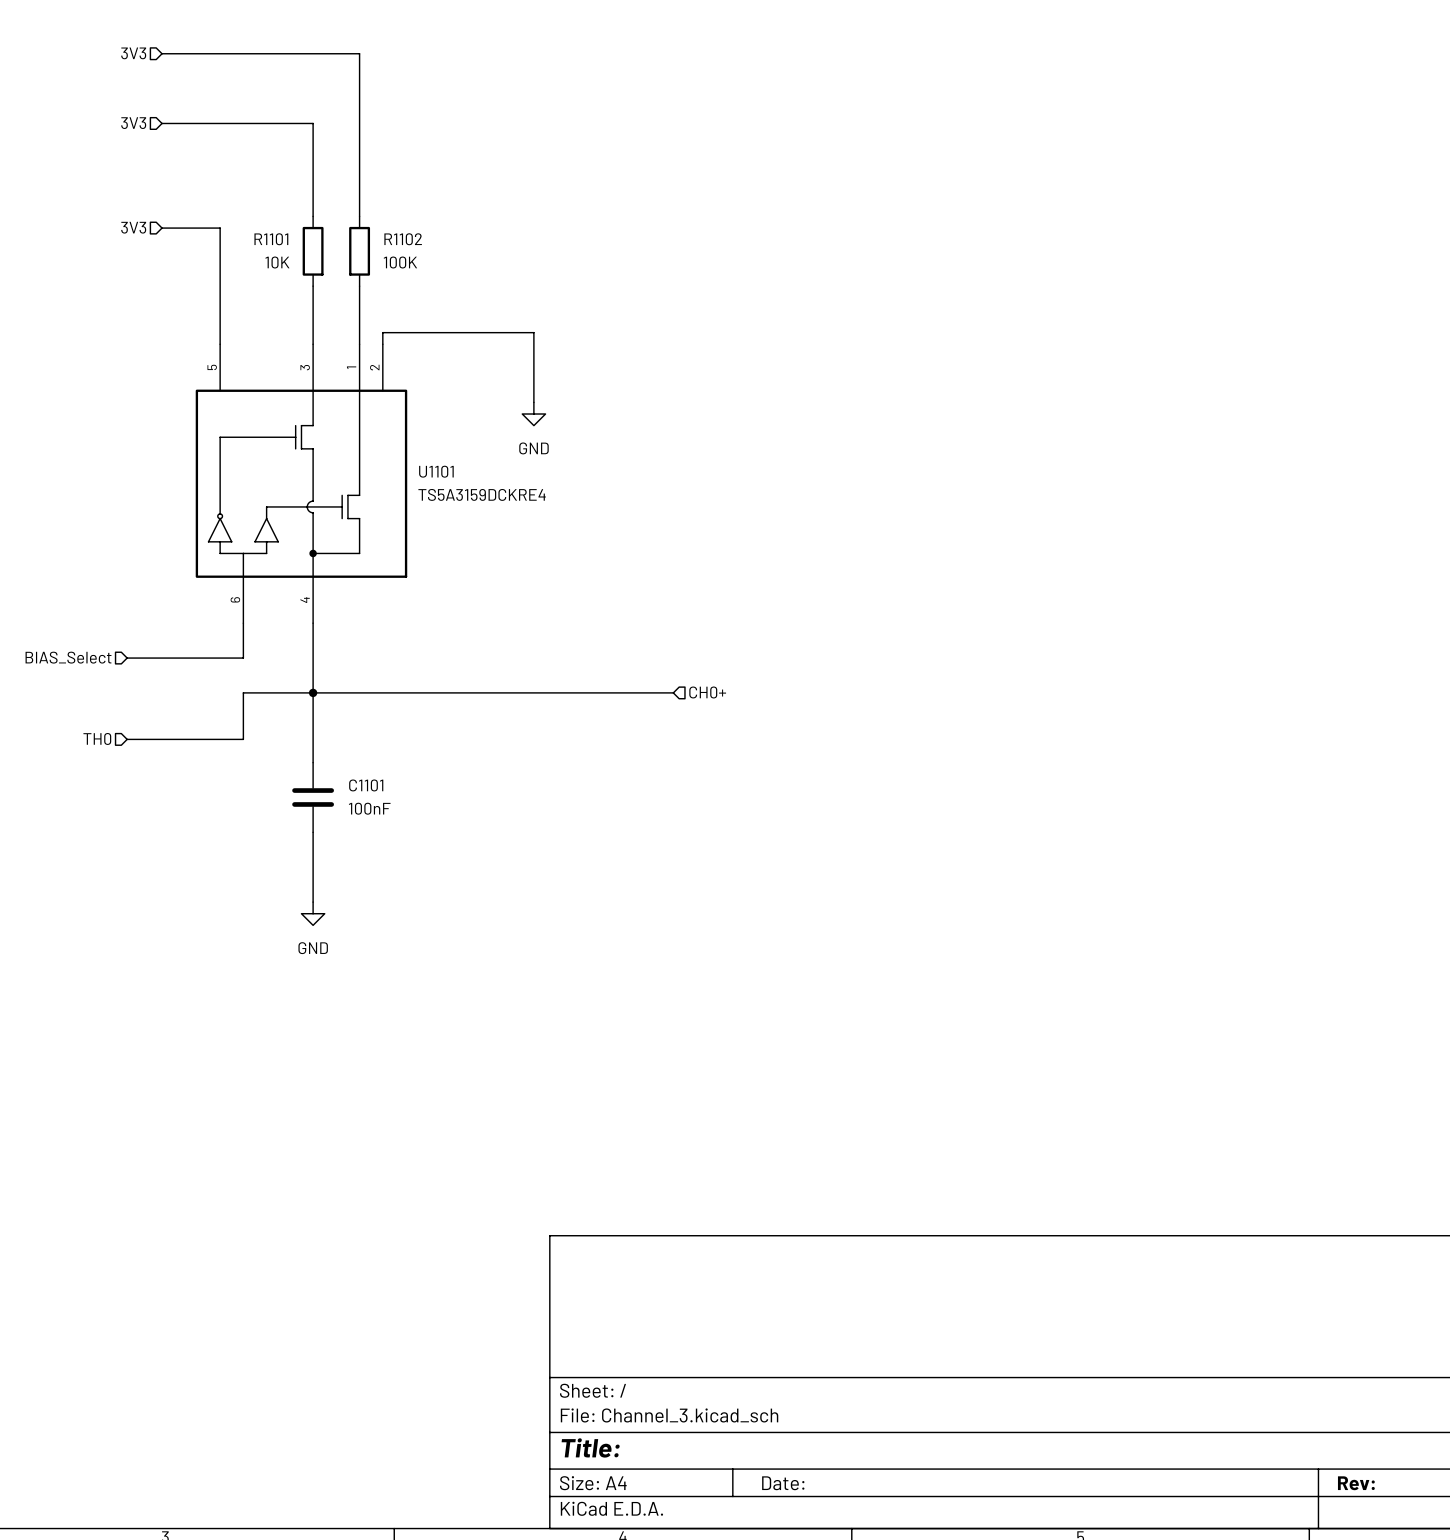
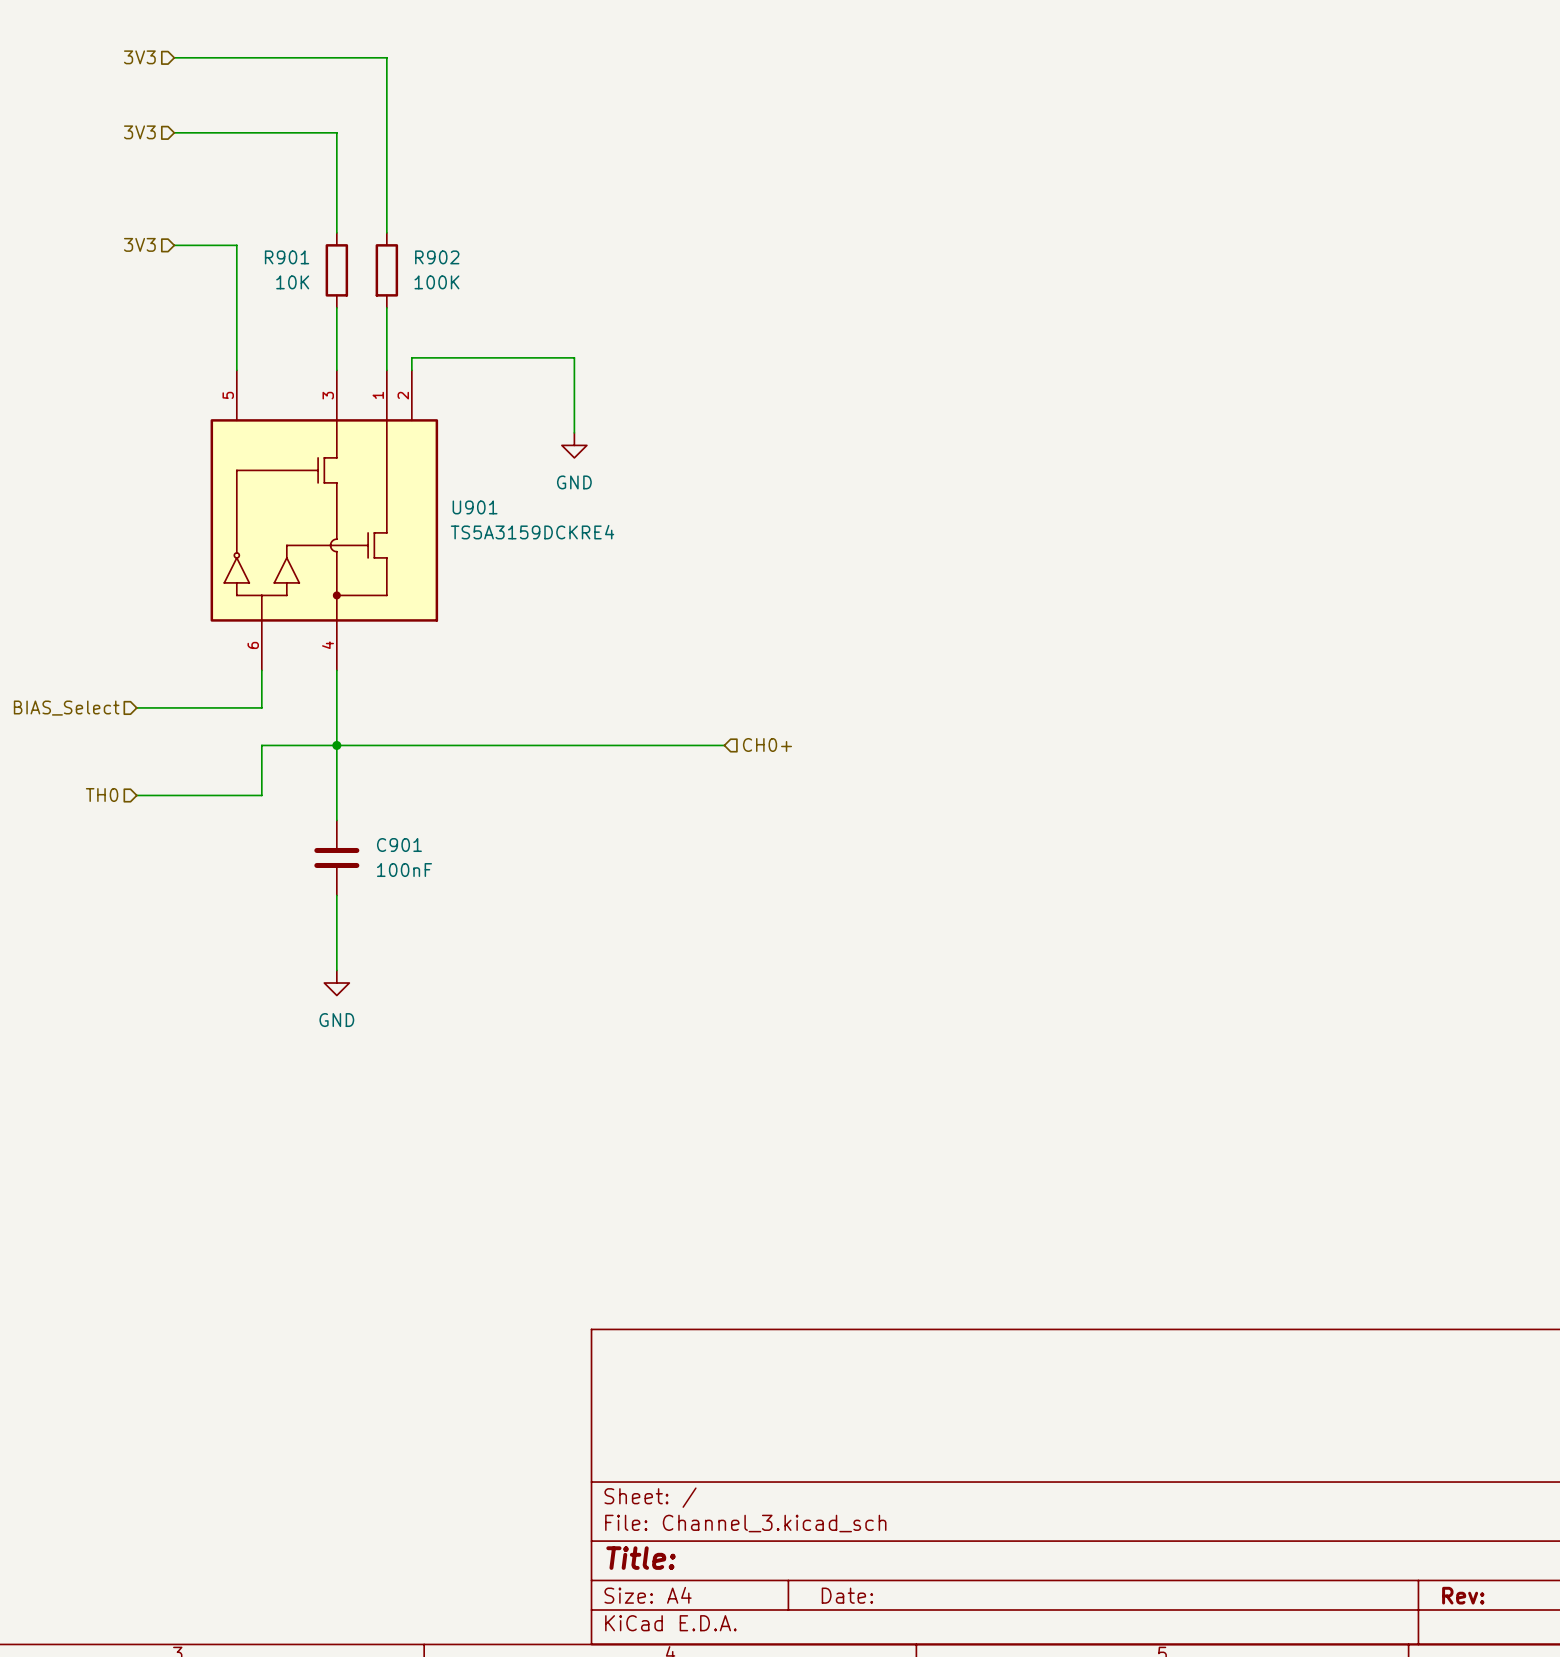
R1101 name: R1101 (271, 239) -> R901 (287, 257)
R1102 name: R1102 (403, 239) -> R902 (437, 257)
U1101 name: U1101 (436, 471) -> U901 (475, 507)
C1101 name: C1101 (366, 785) -> C901 (399, 845)

